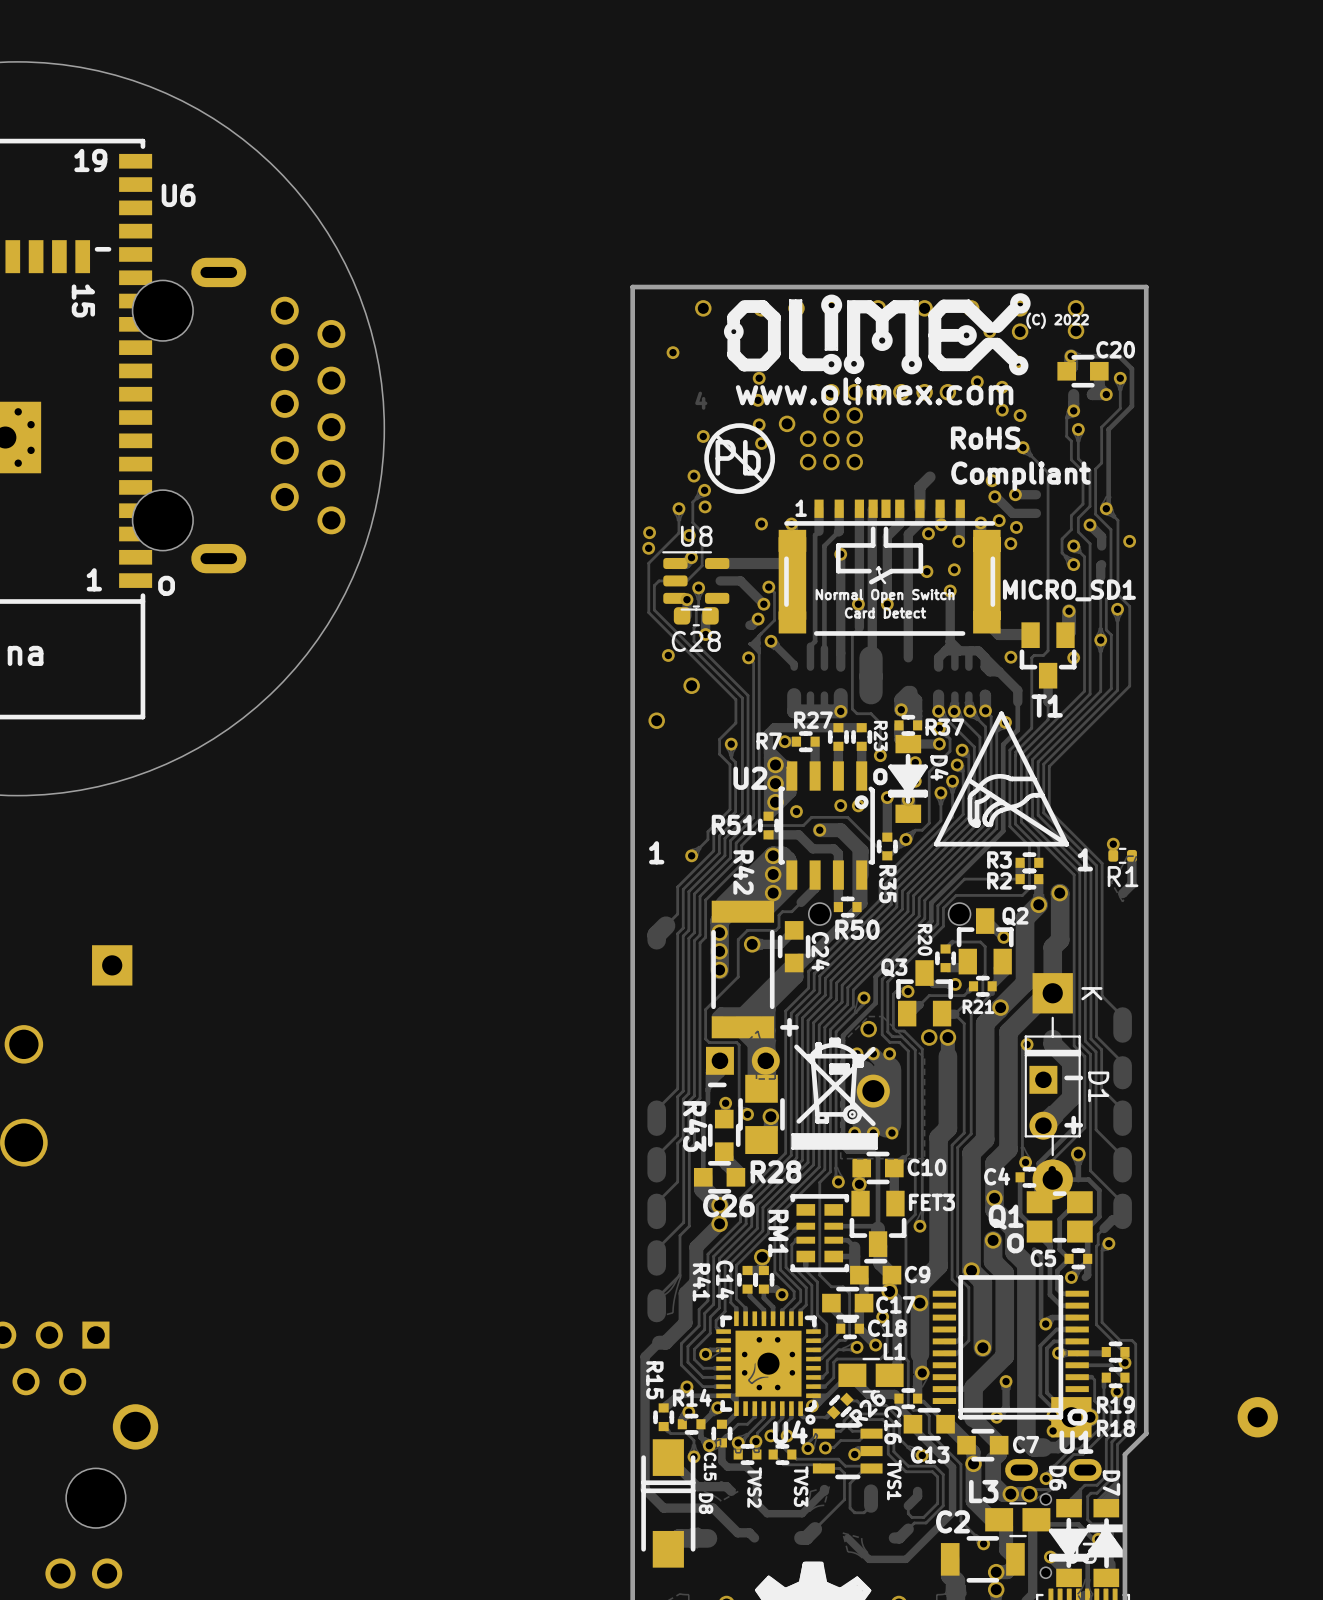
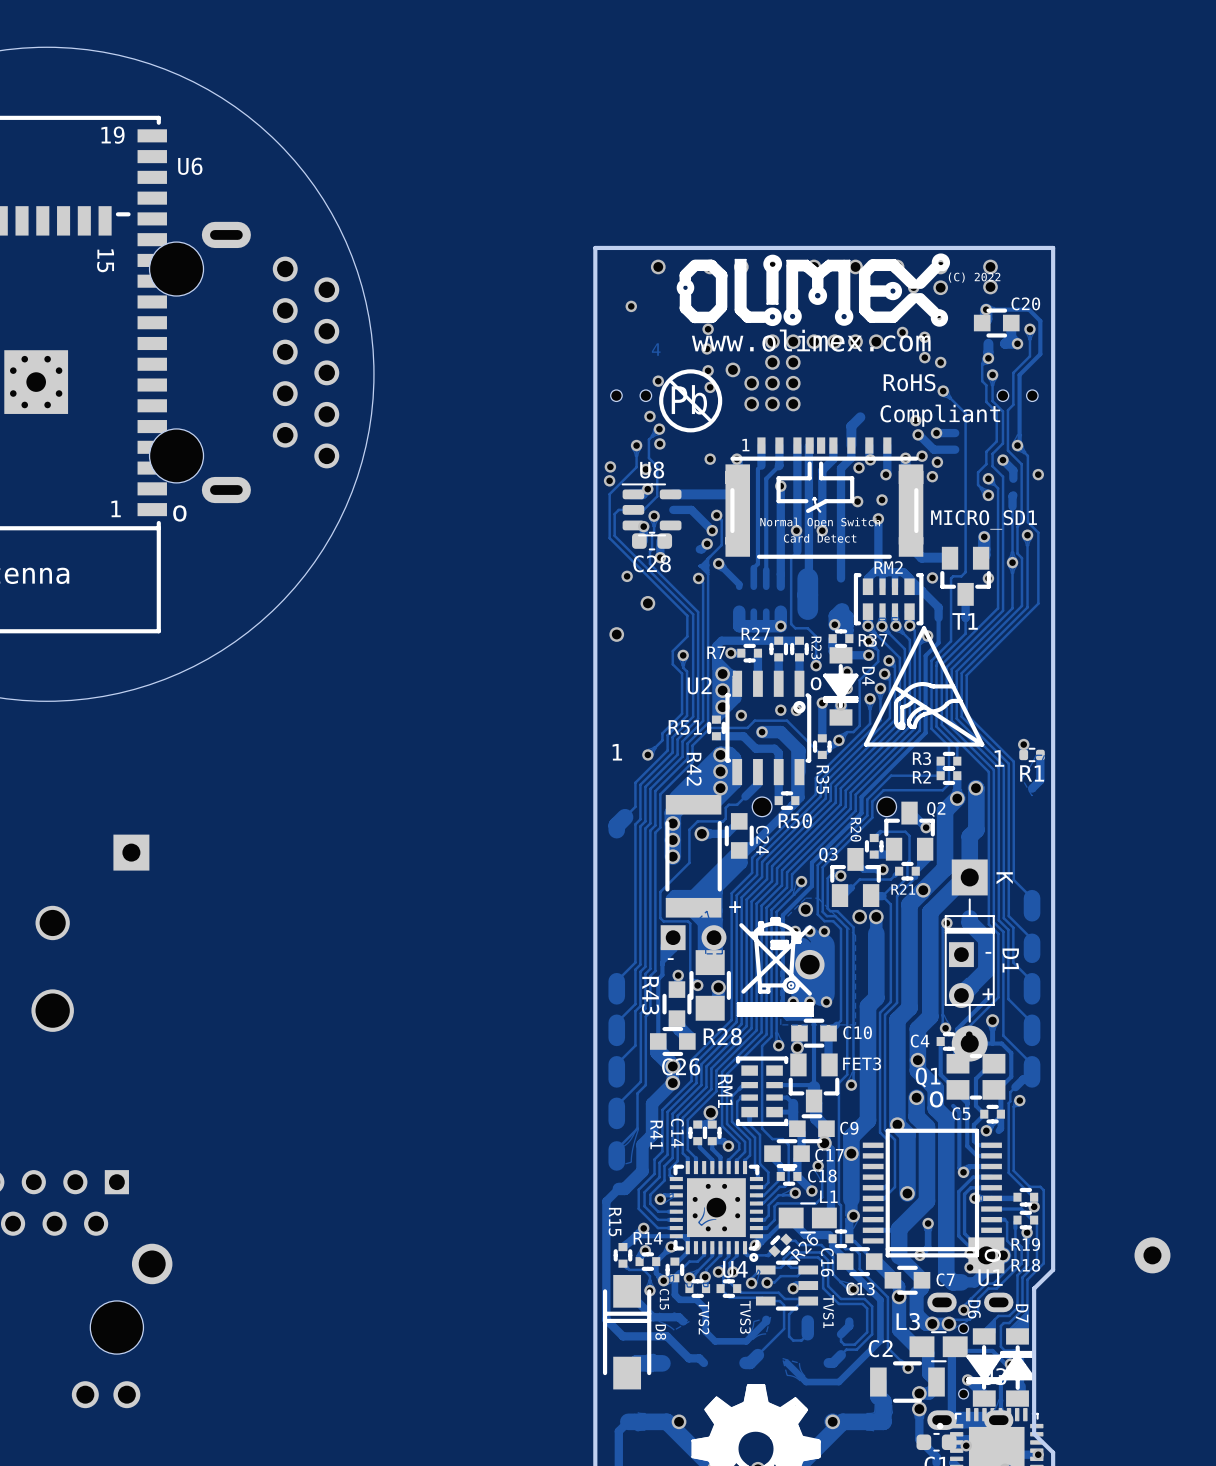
part: none -> (631, 395)
part: none -> (1017, 395)
RM2: none -> (888, 599)

